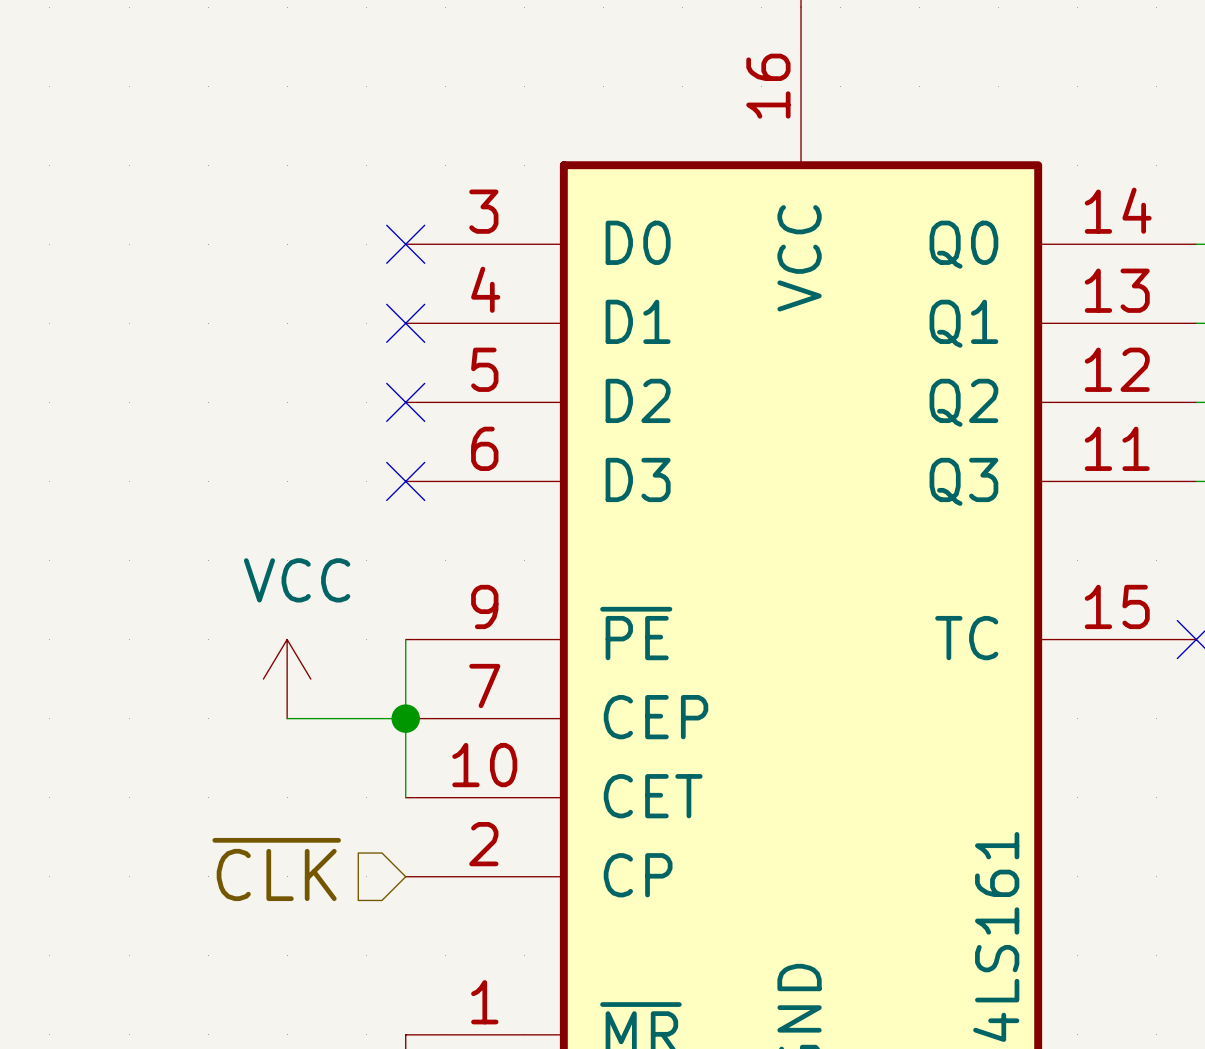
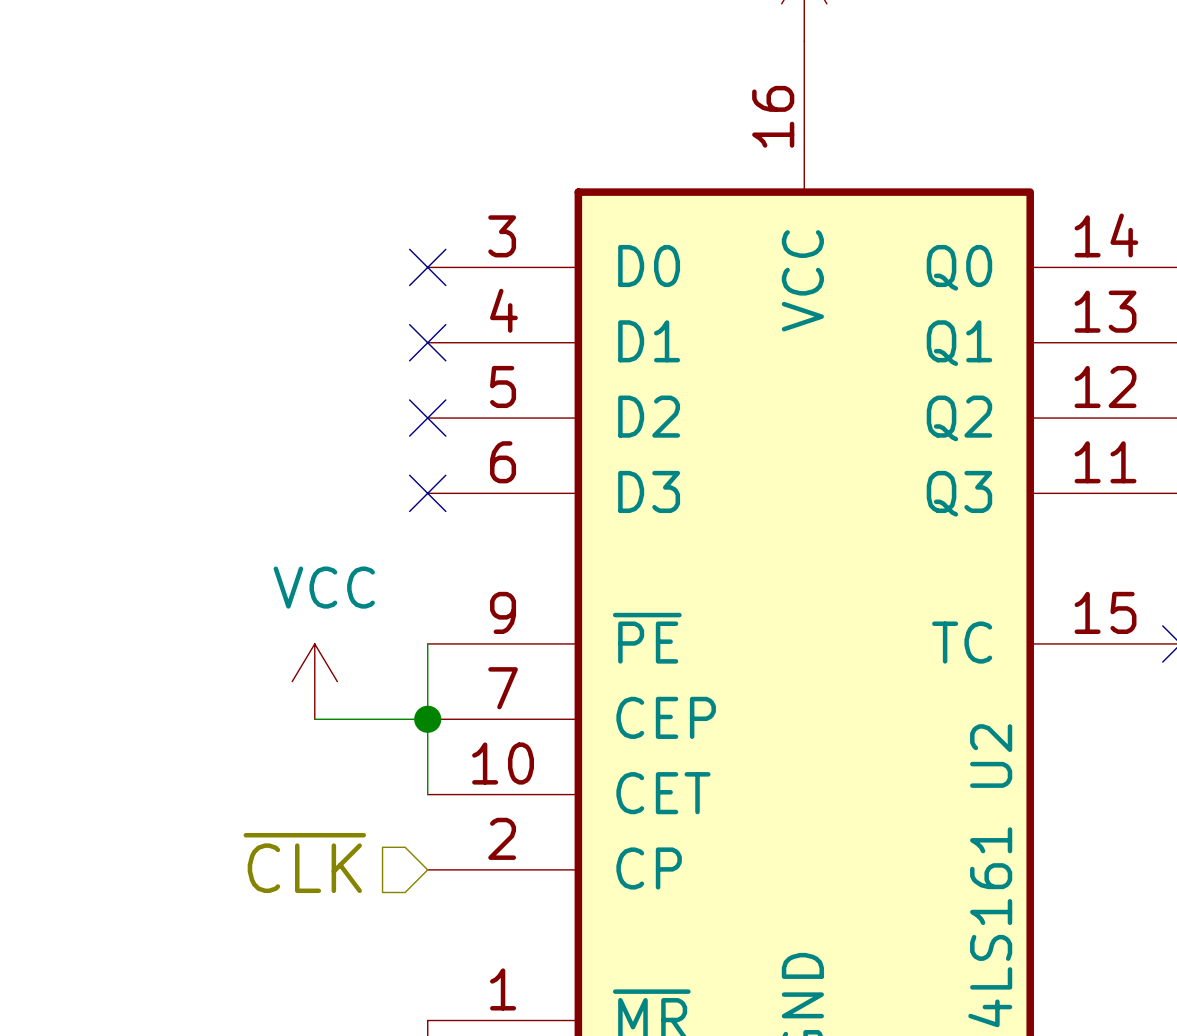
U2 name: none -> U2 (991, 756)

